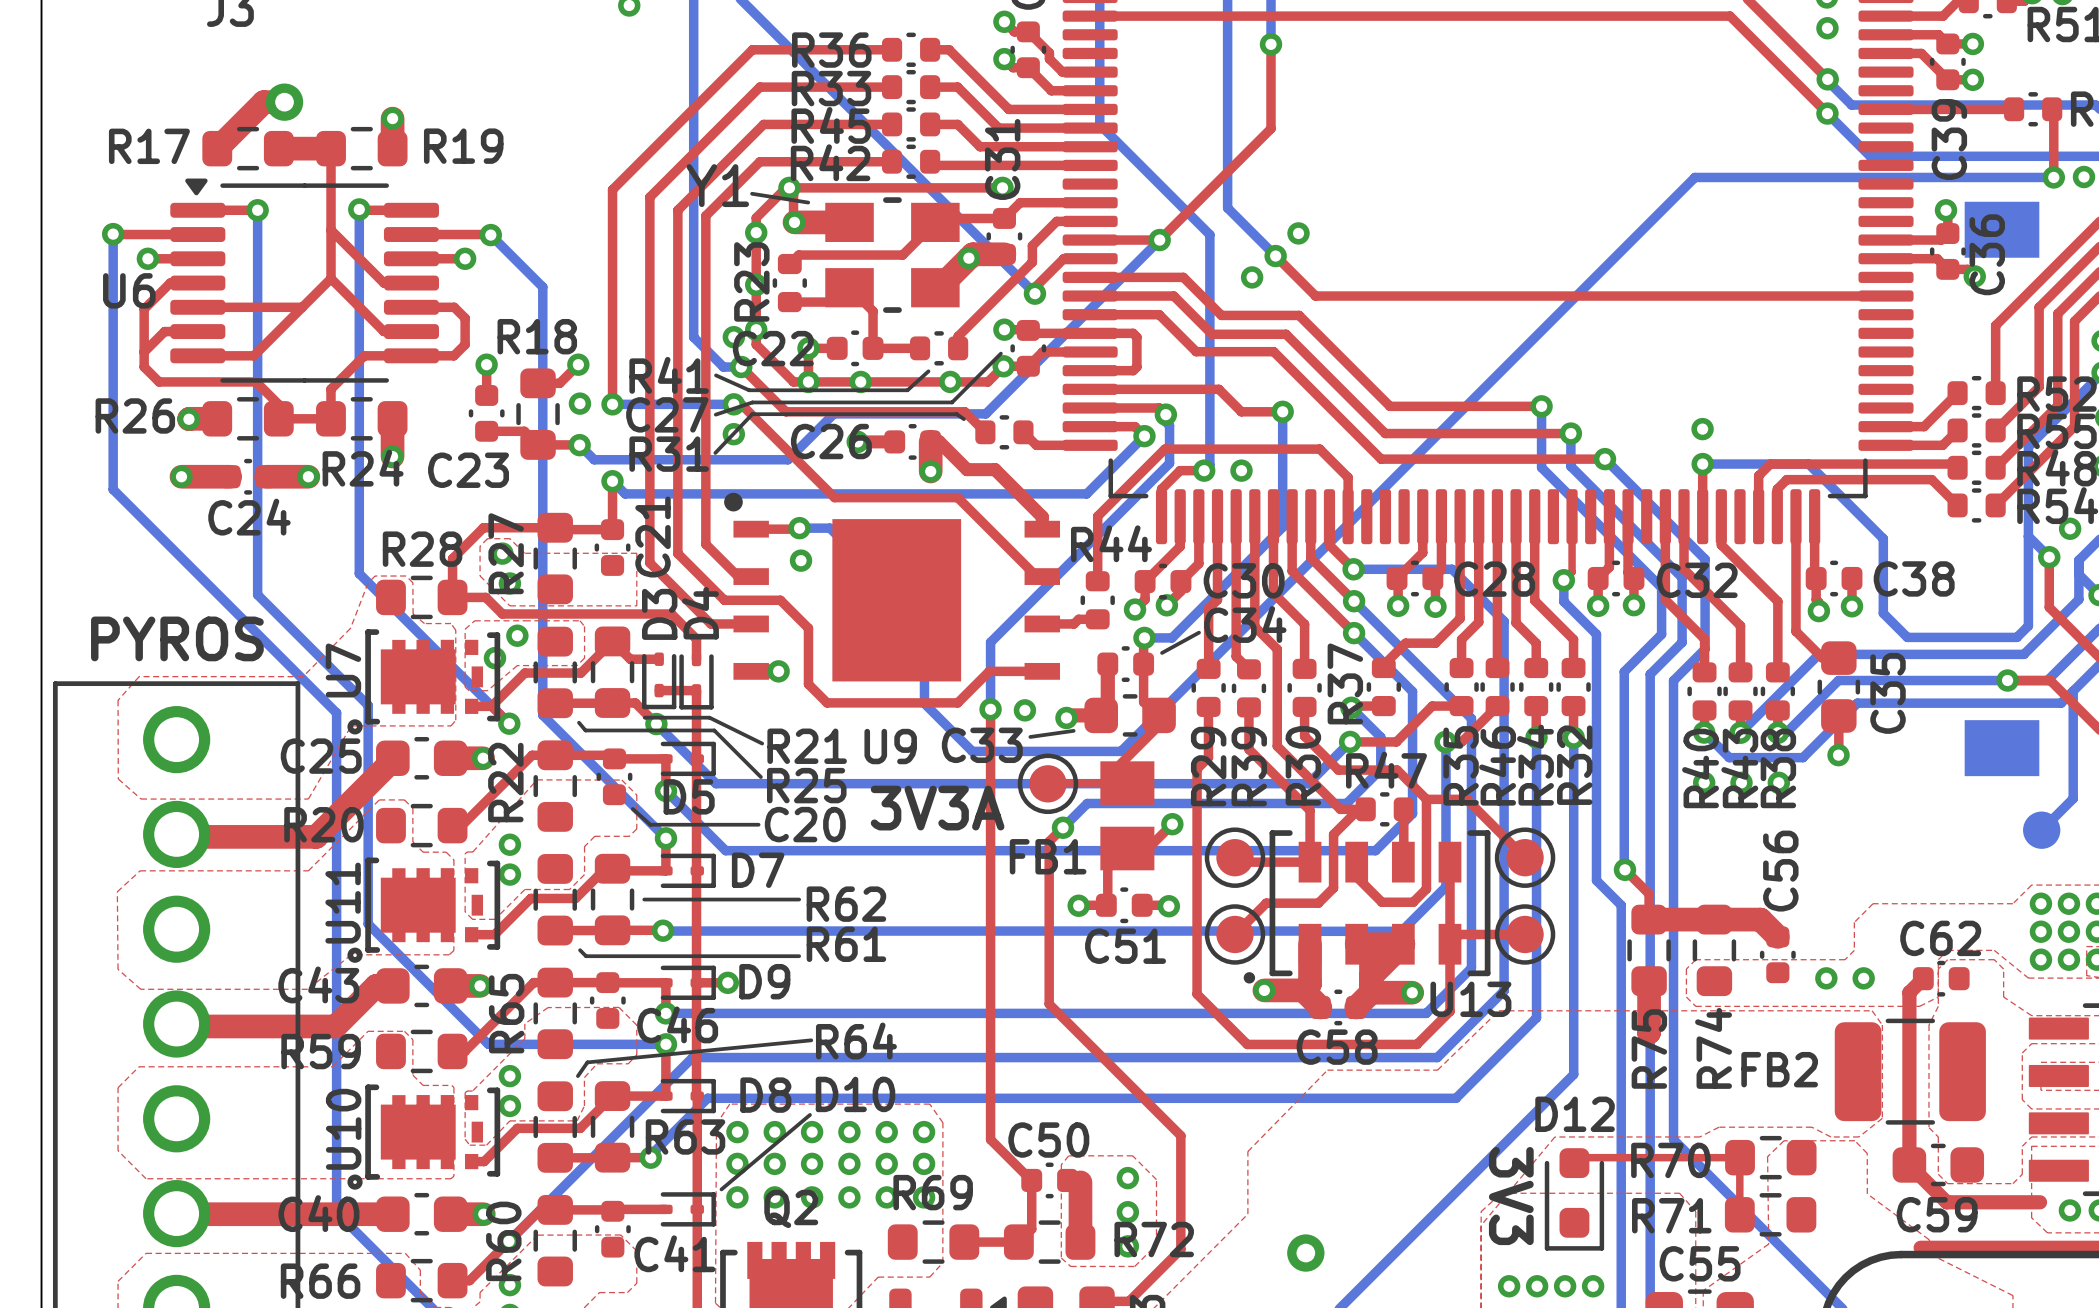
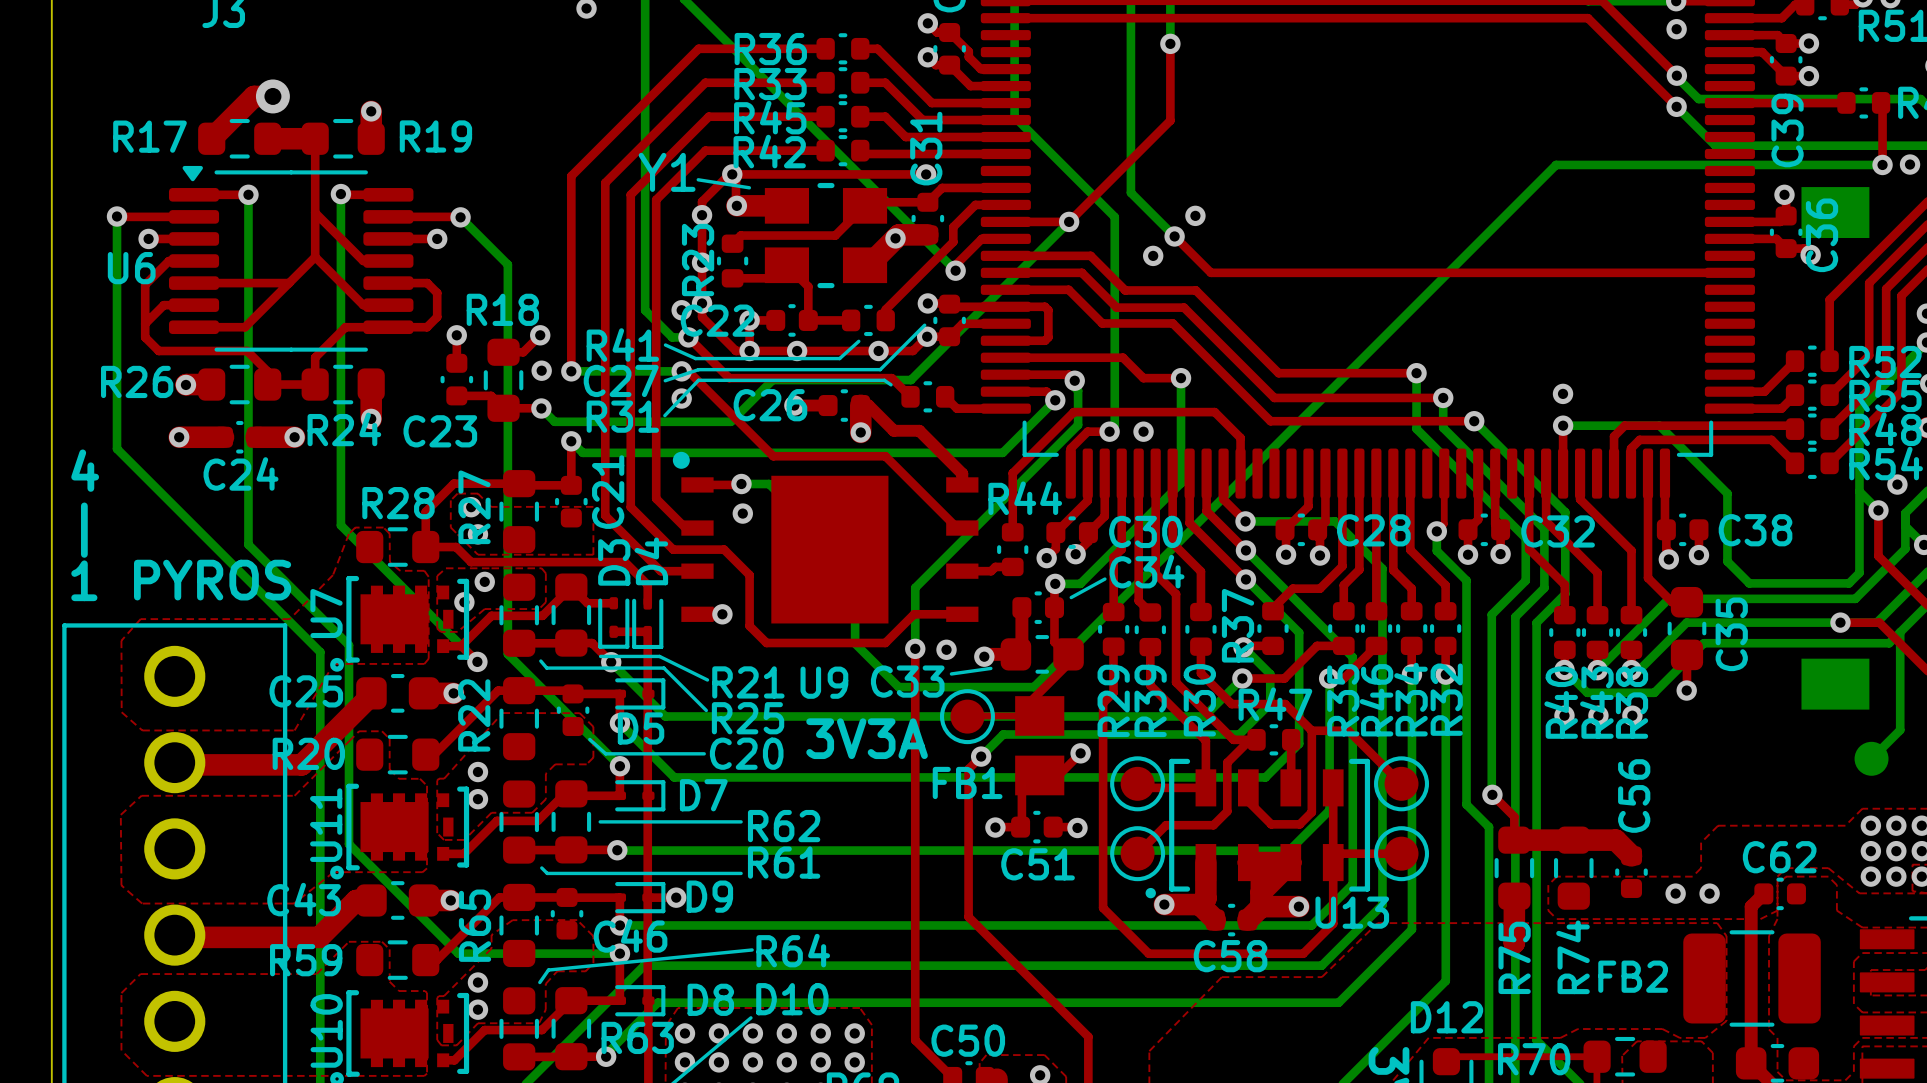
text: none -> 4 (85, 470)
text: none -> | (84, 530)
text: none -> 1 (84, 580)
text position: PYROS (177, 638) -> PYROS (212, 580)

